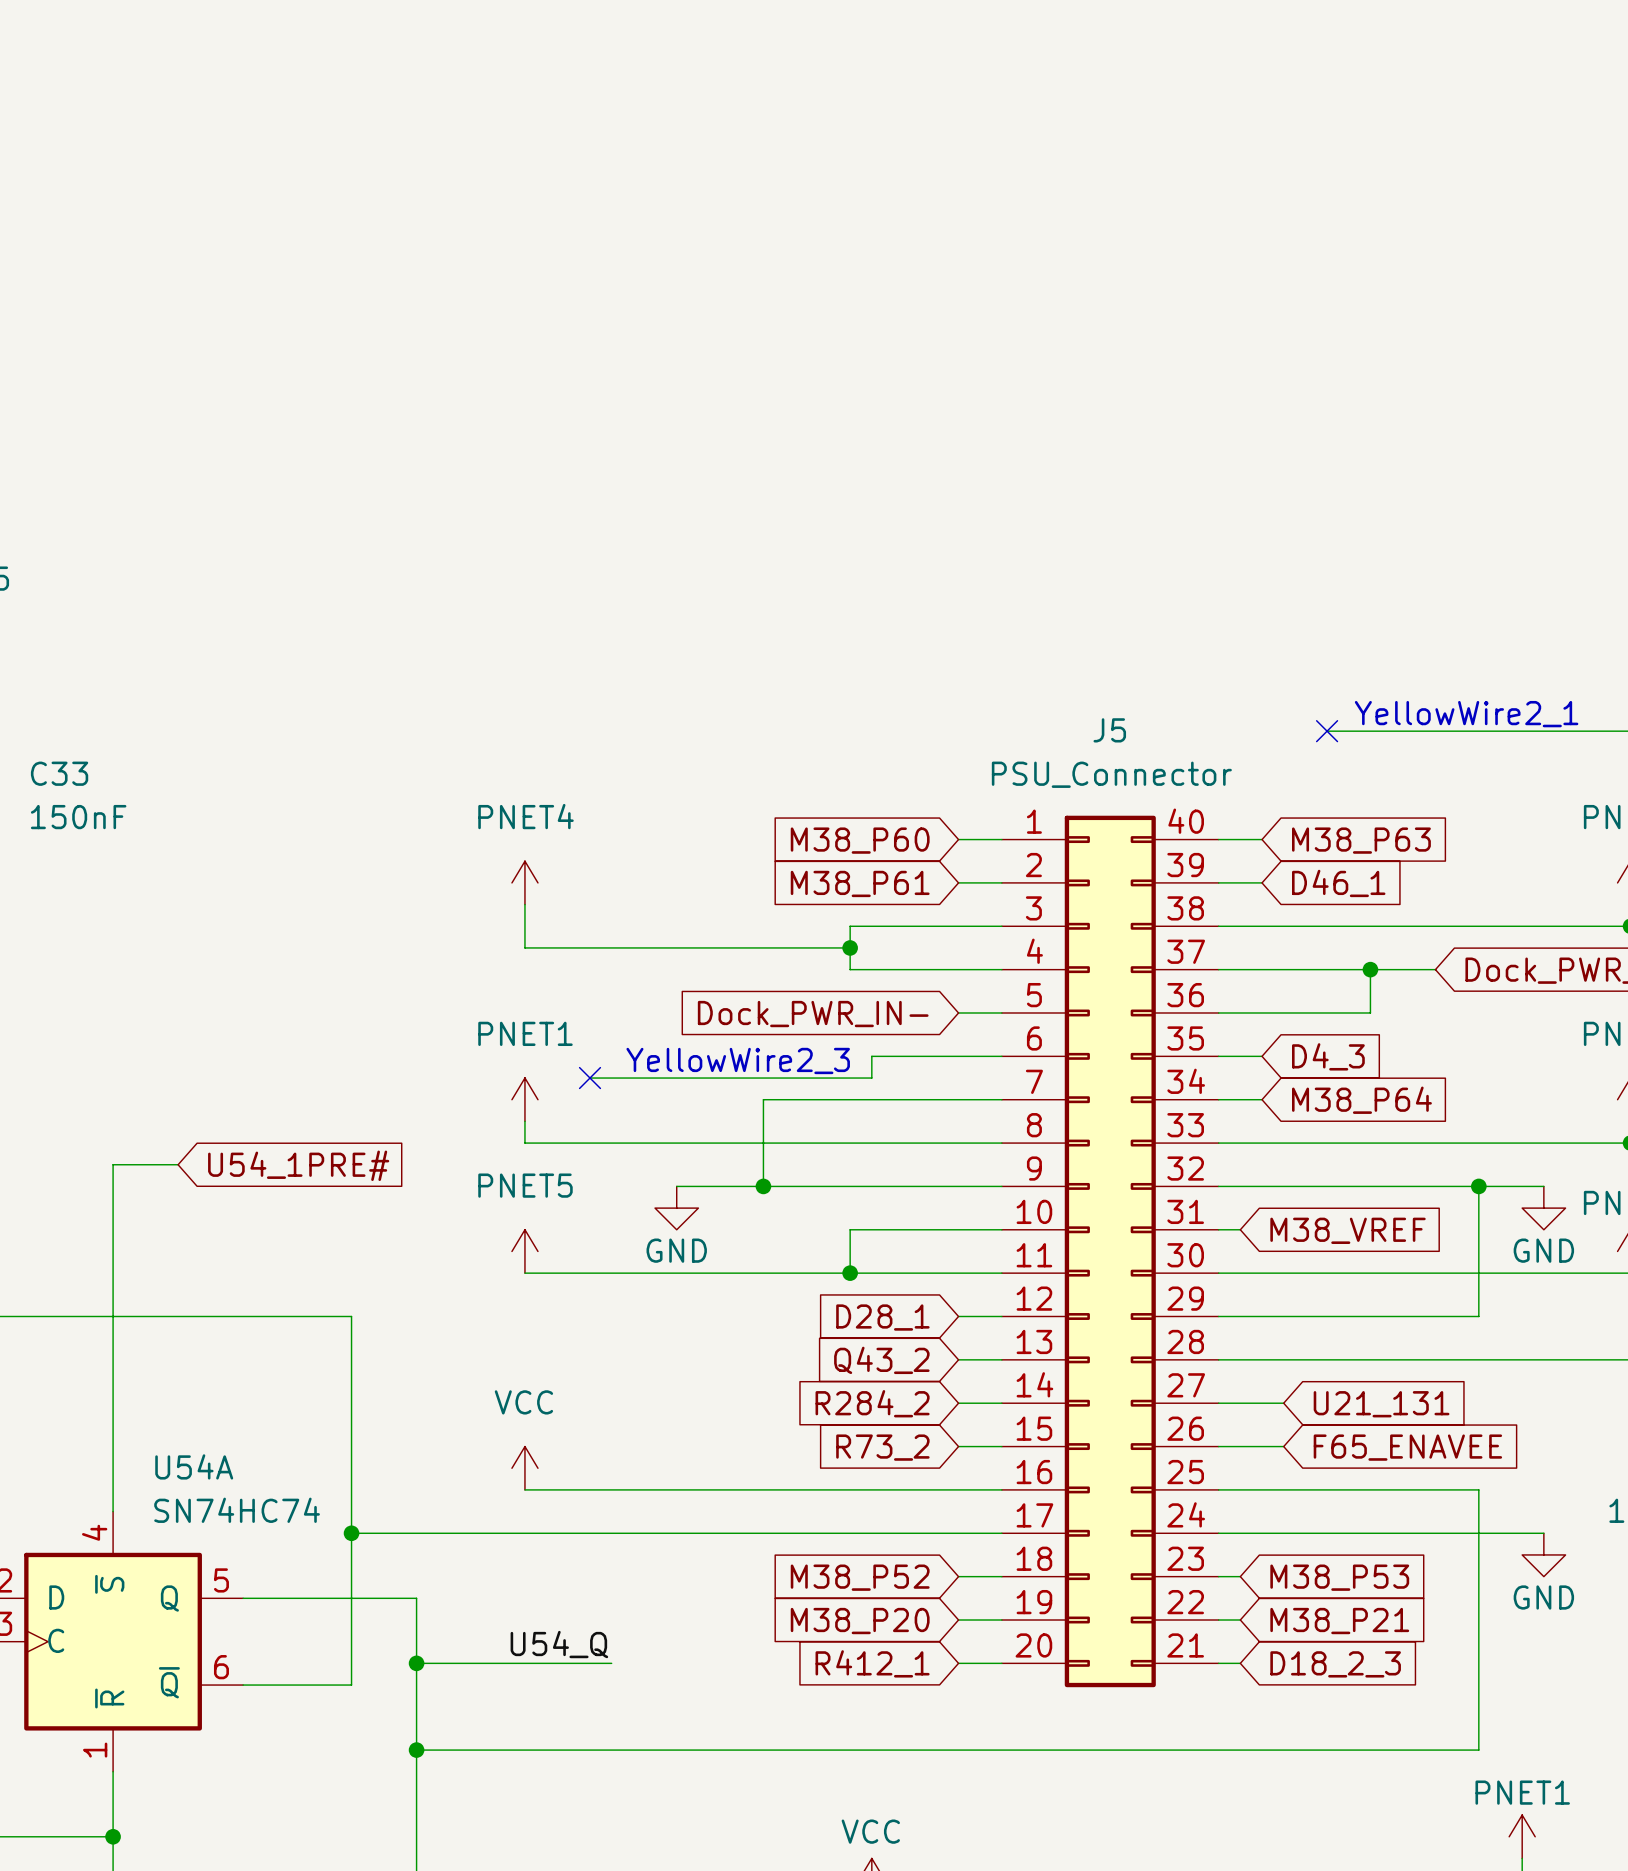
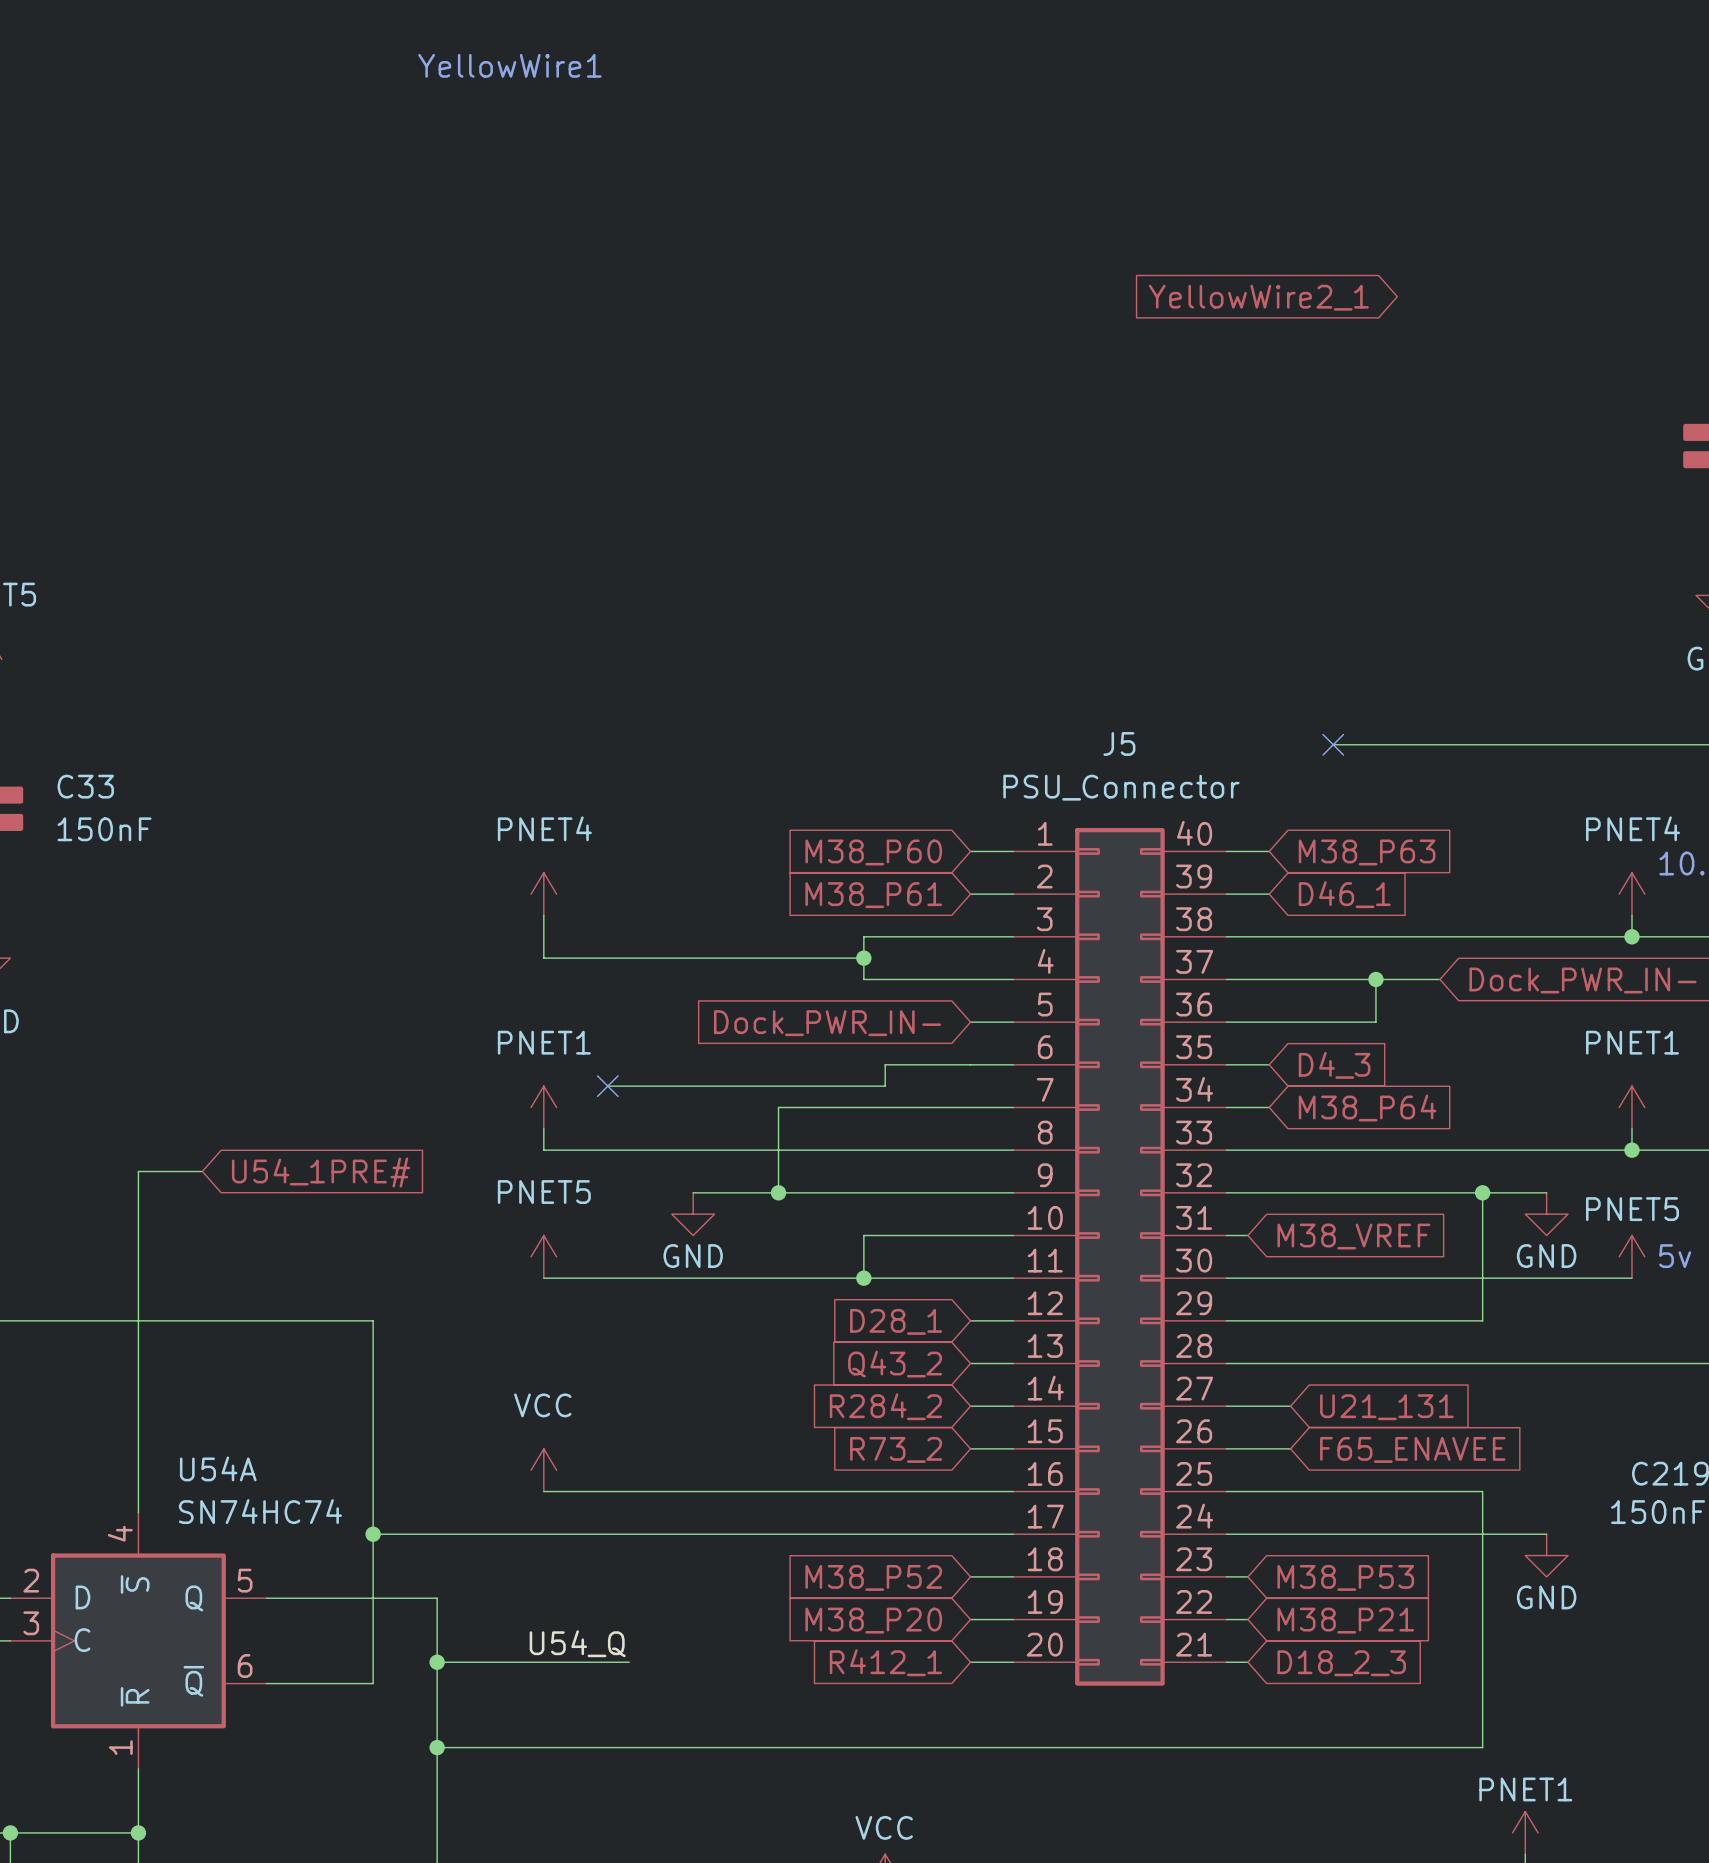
text: none -> YellowWire1 (509, 65)
global label: none -> YellowWire2_1 (1258, 297)
text: YellowWire2_1 (1466, 714) -> none
text: YellowWire2_3 (738, 1060) -> none

